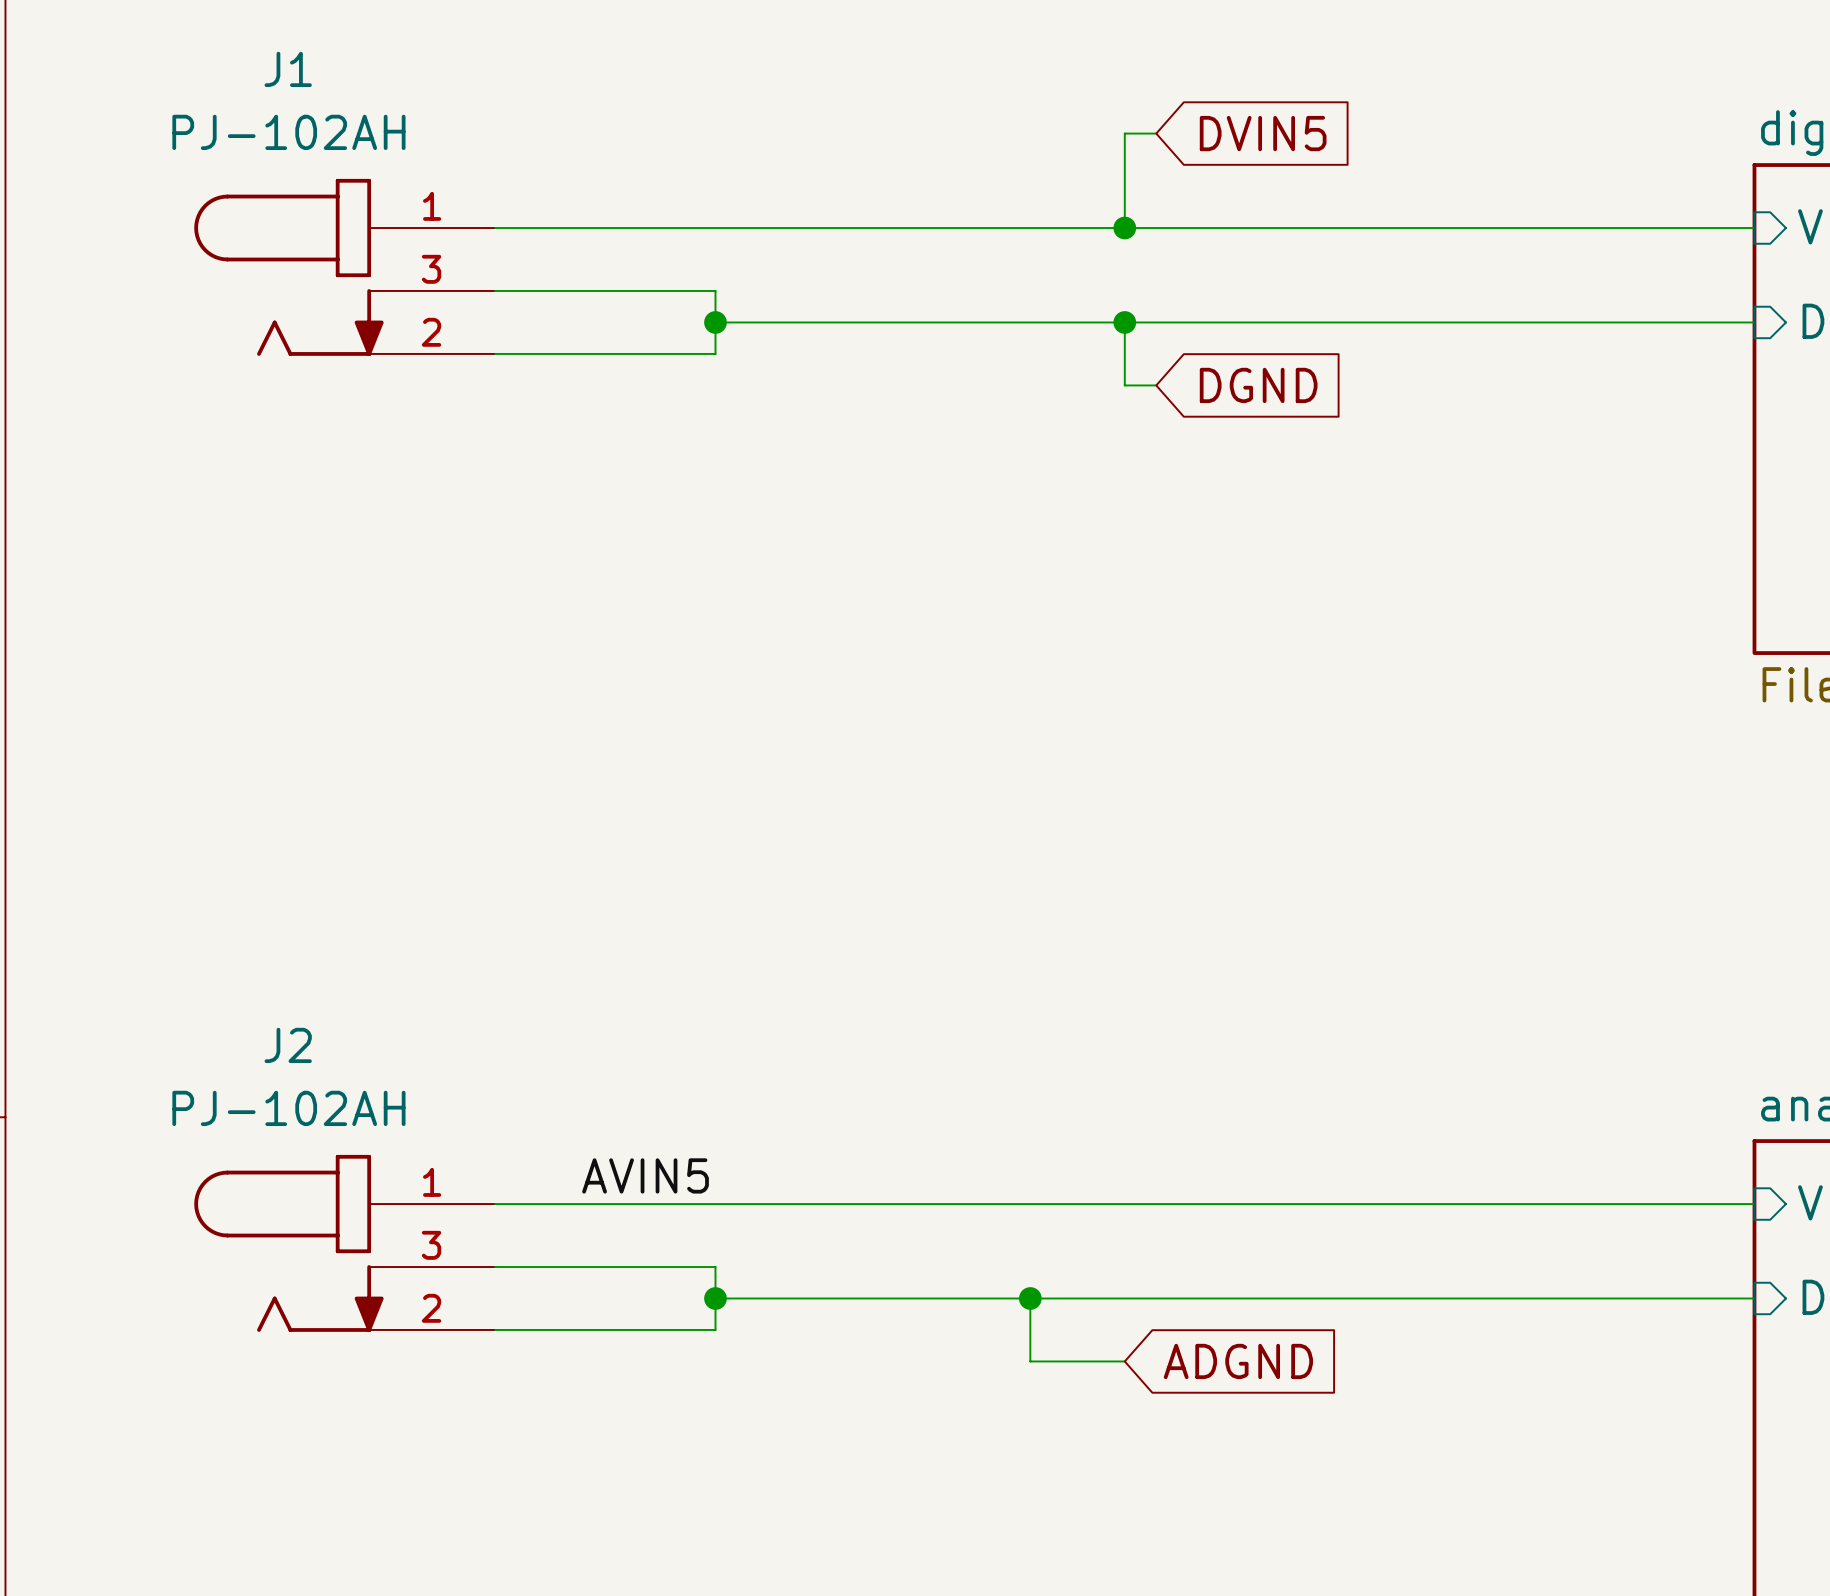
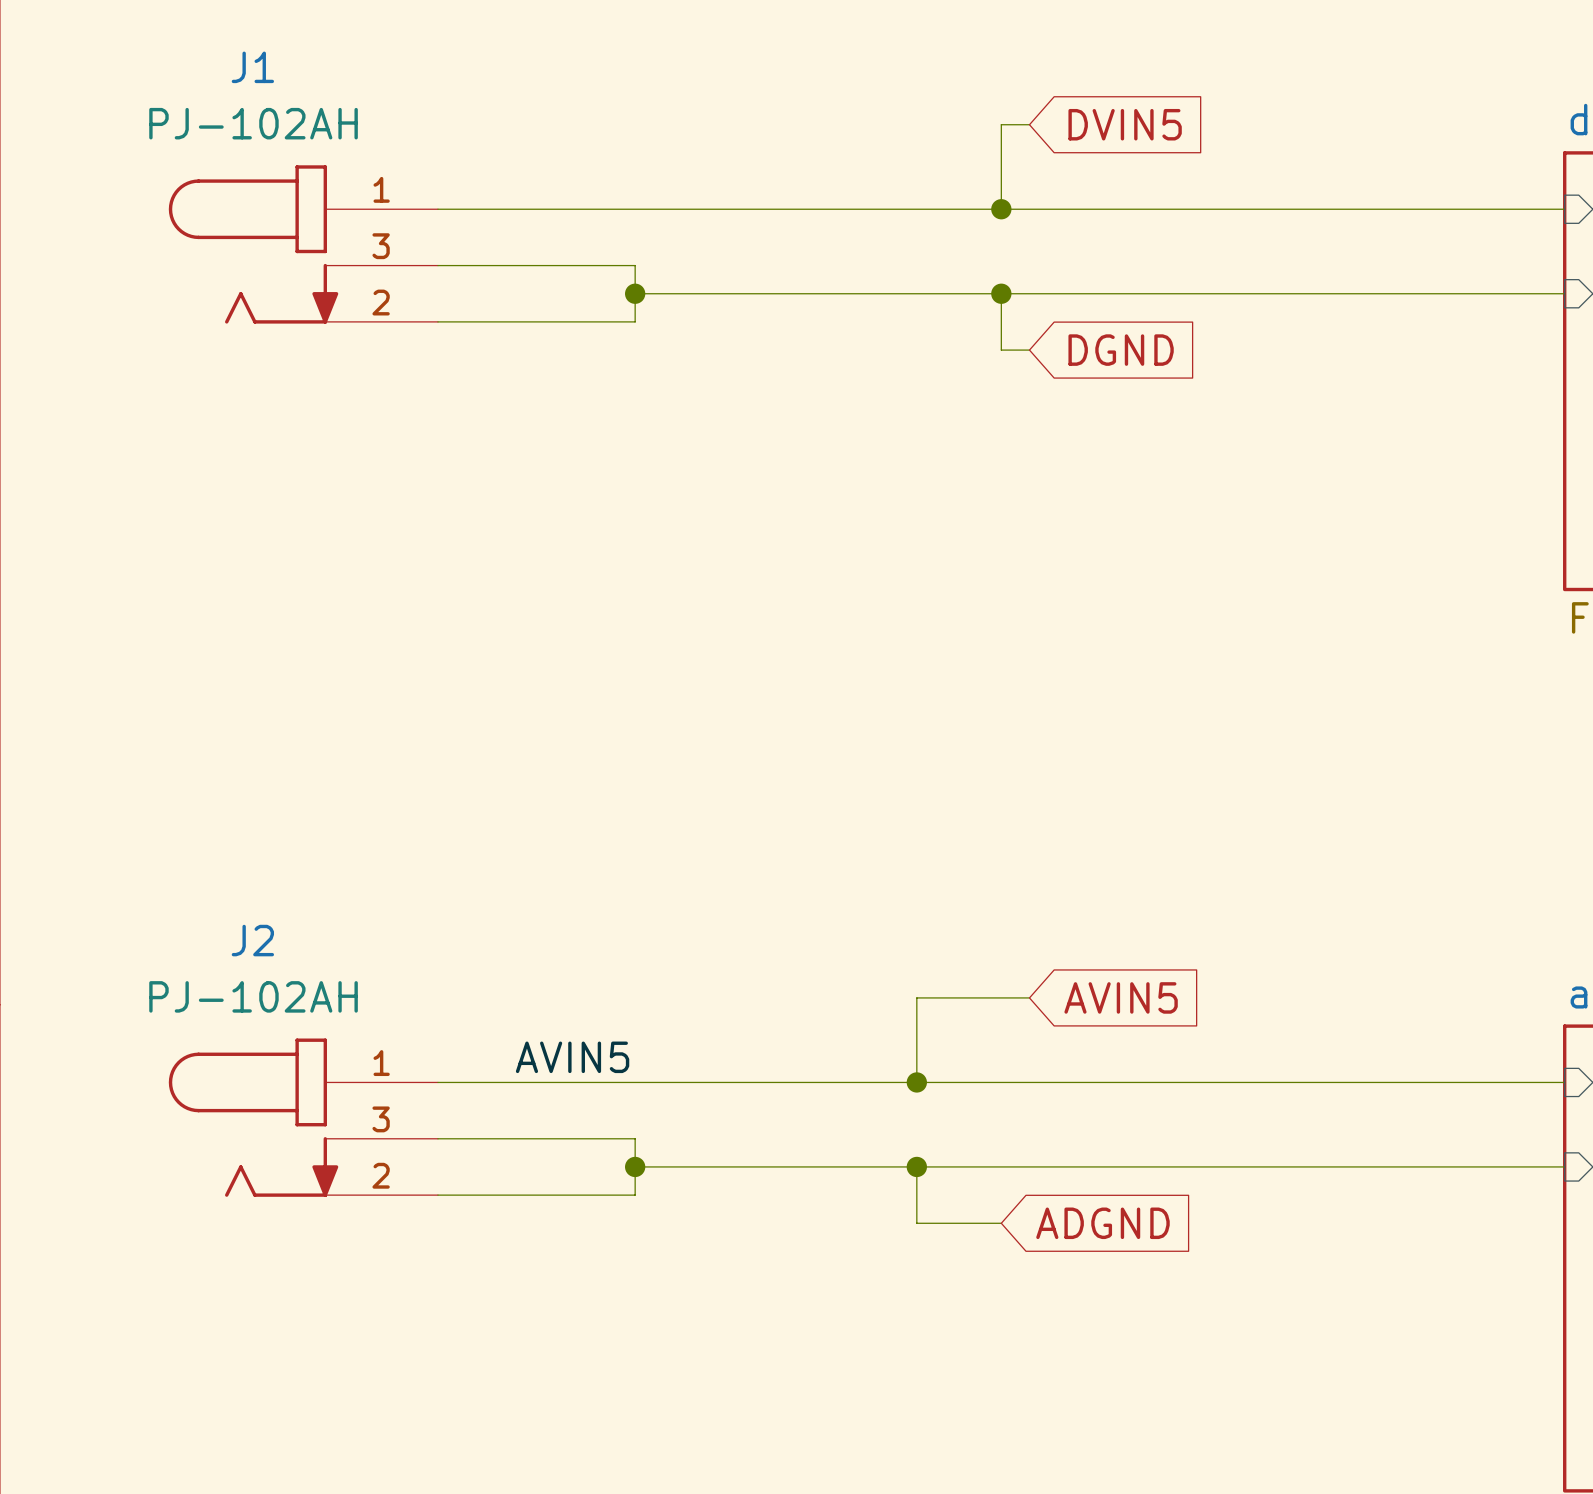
wire: none -> (1029, 997) (916, 997) (916, 1082)
global label: none -> AVIN5 (1121, 997)
junction: none -> (916, 1082)

